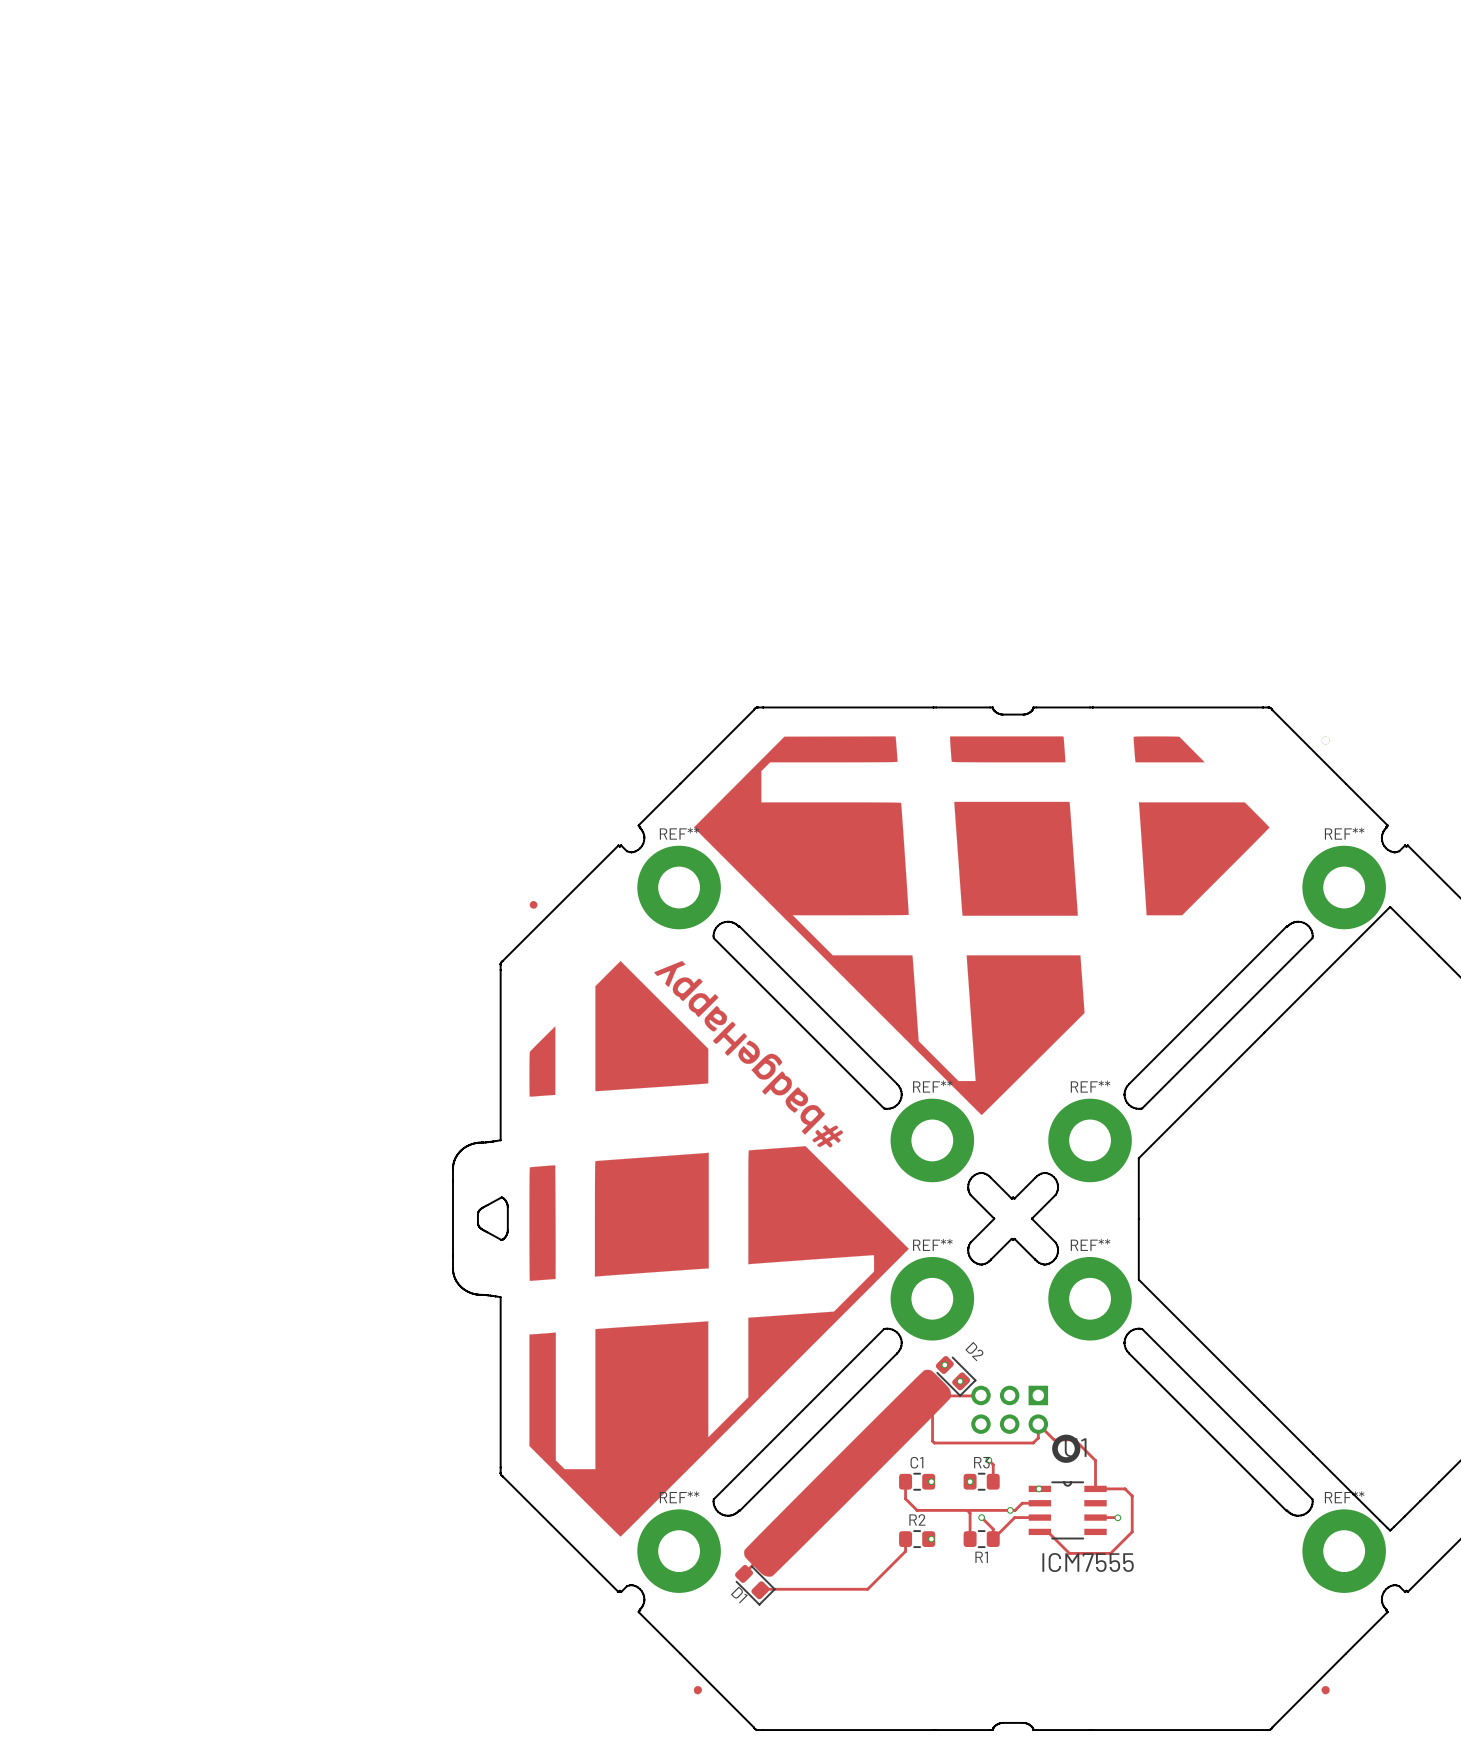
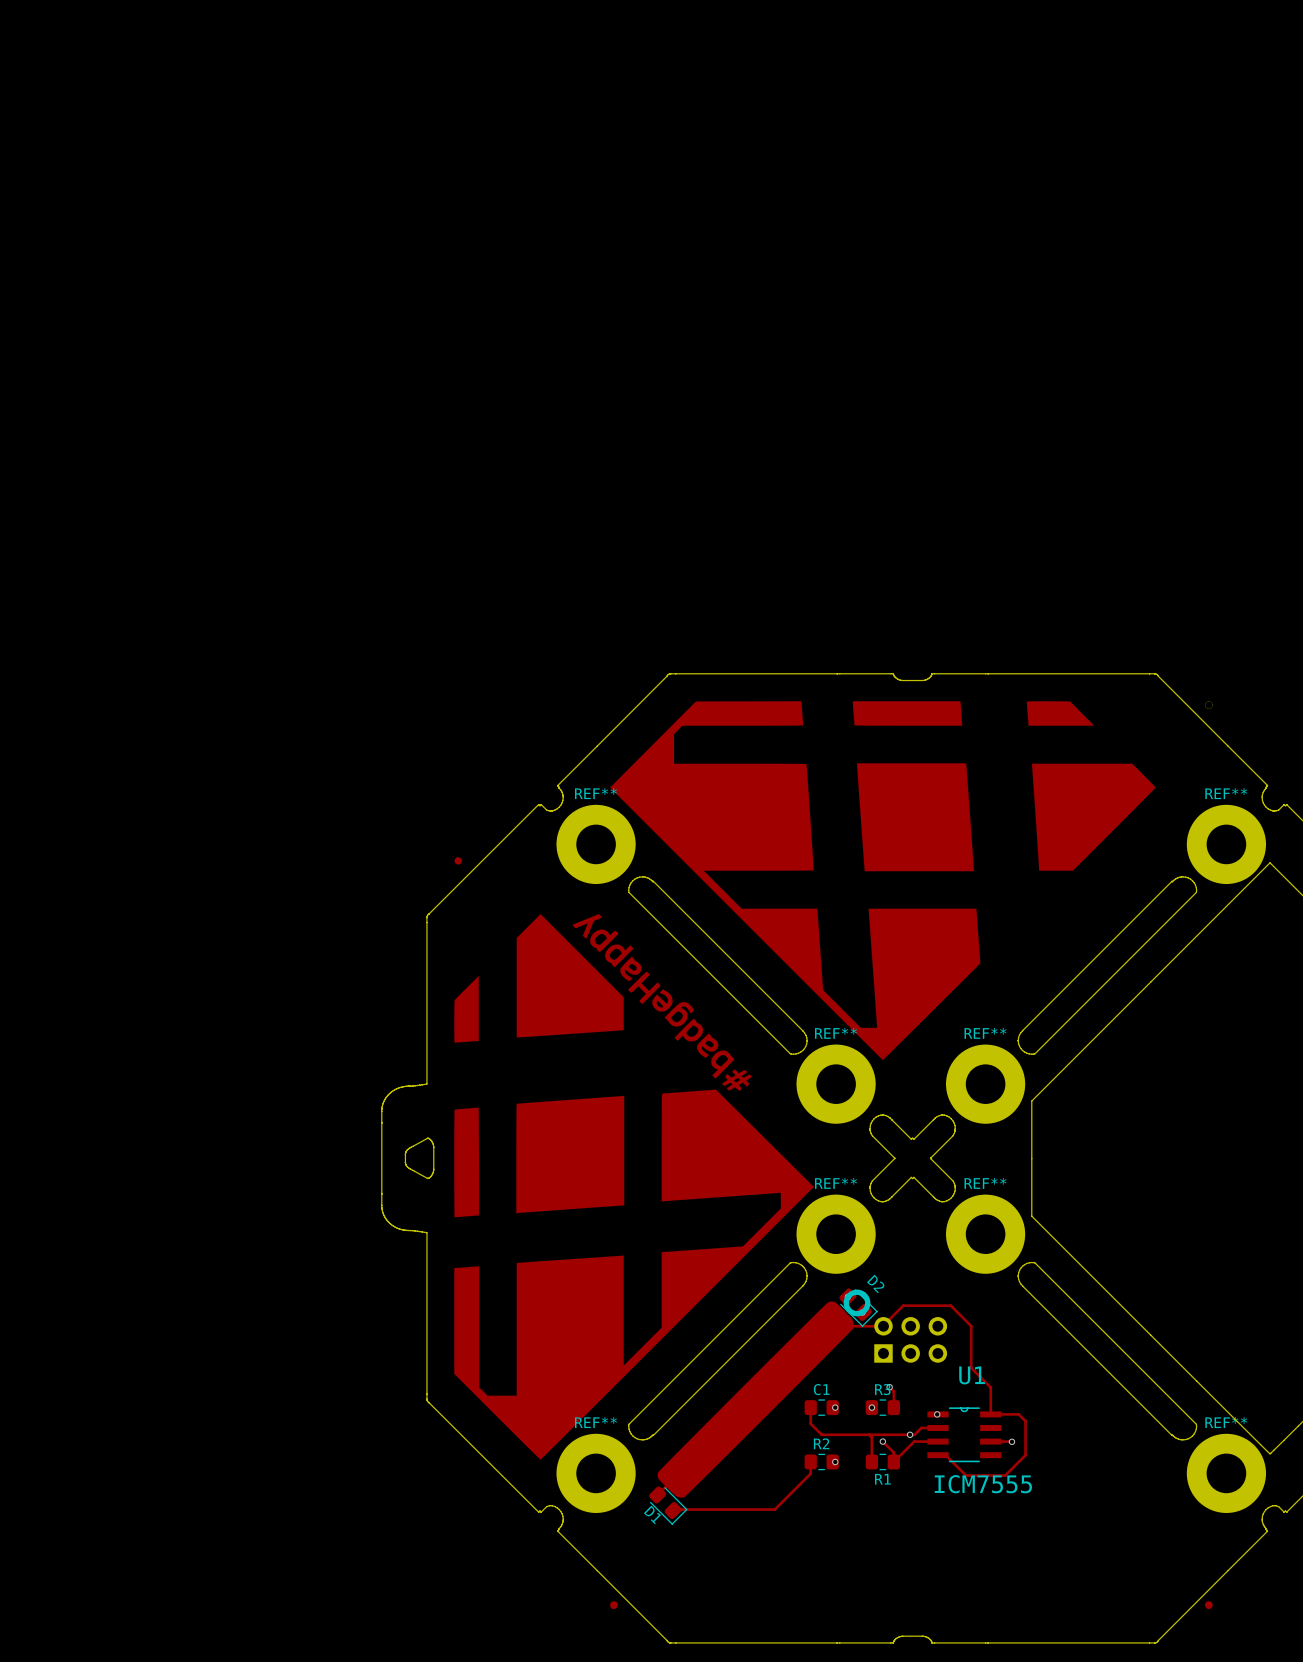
track: (932, 1395) (932, 1441) (934, 1443) (1033, 1443) (1038, 1437) (1038, 1424) (1054, 1439) (1074, 1439) -> (883, 1325) (903, 1305) (950, 1305) (971, 1326) (971, 1367)
part rotation: 0° (1025, 1424) -> 180° (895, 1326)

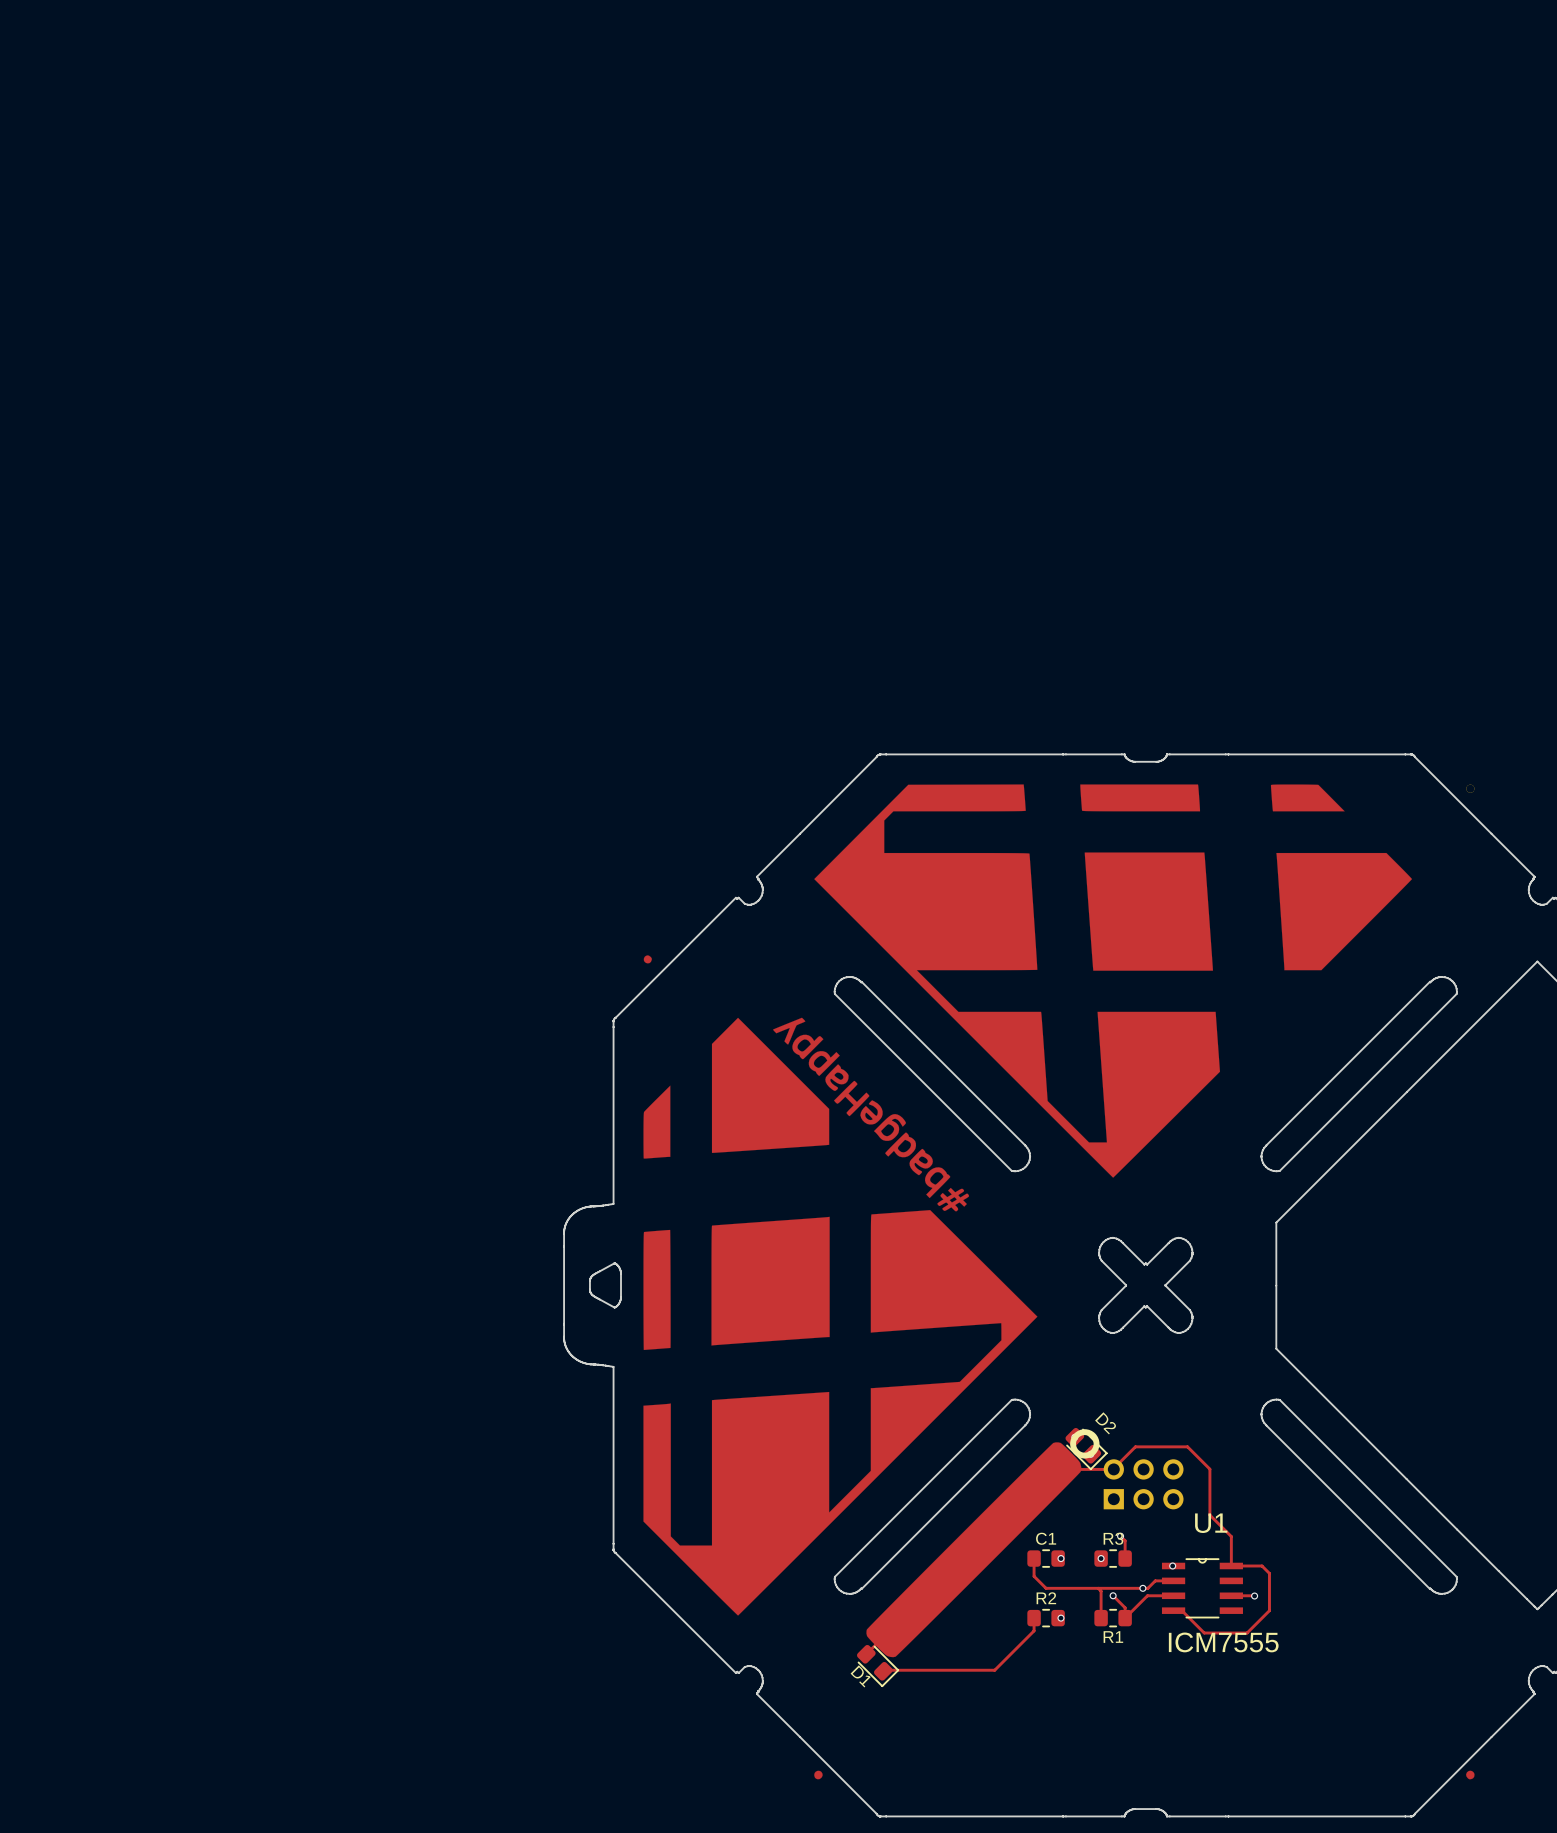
REF**: (596, 844) -> none
REF**: (1226, 844) -> none
REF**: (836, 1084) -> none
REF**: (985, 1084) -> none
REF**: (836, 1234) -> none
REF**: (985, 1234) -> none
REF**: (596, 1473) -> none
REF**: (1226, 1473) -> none

